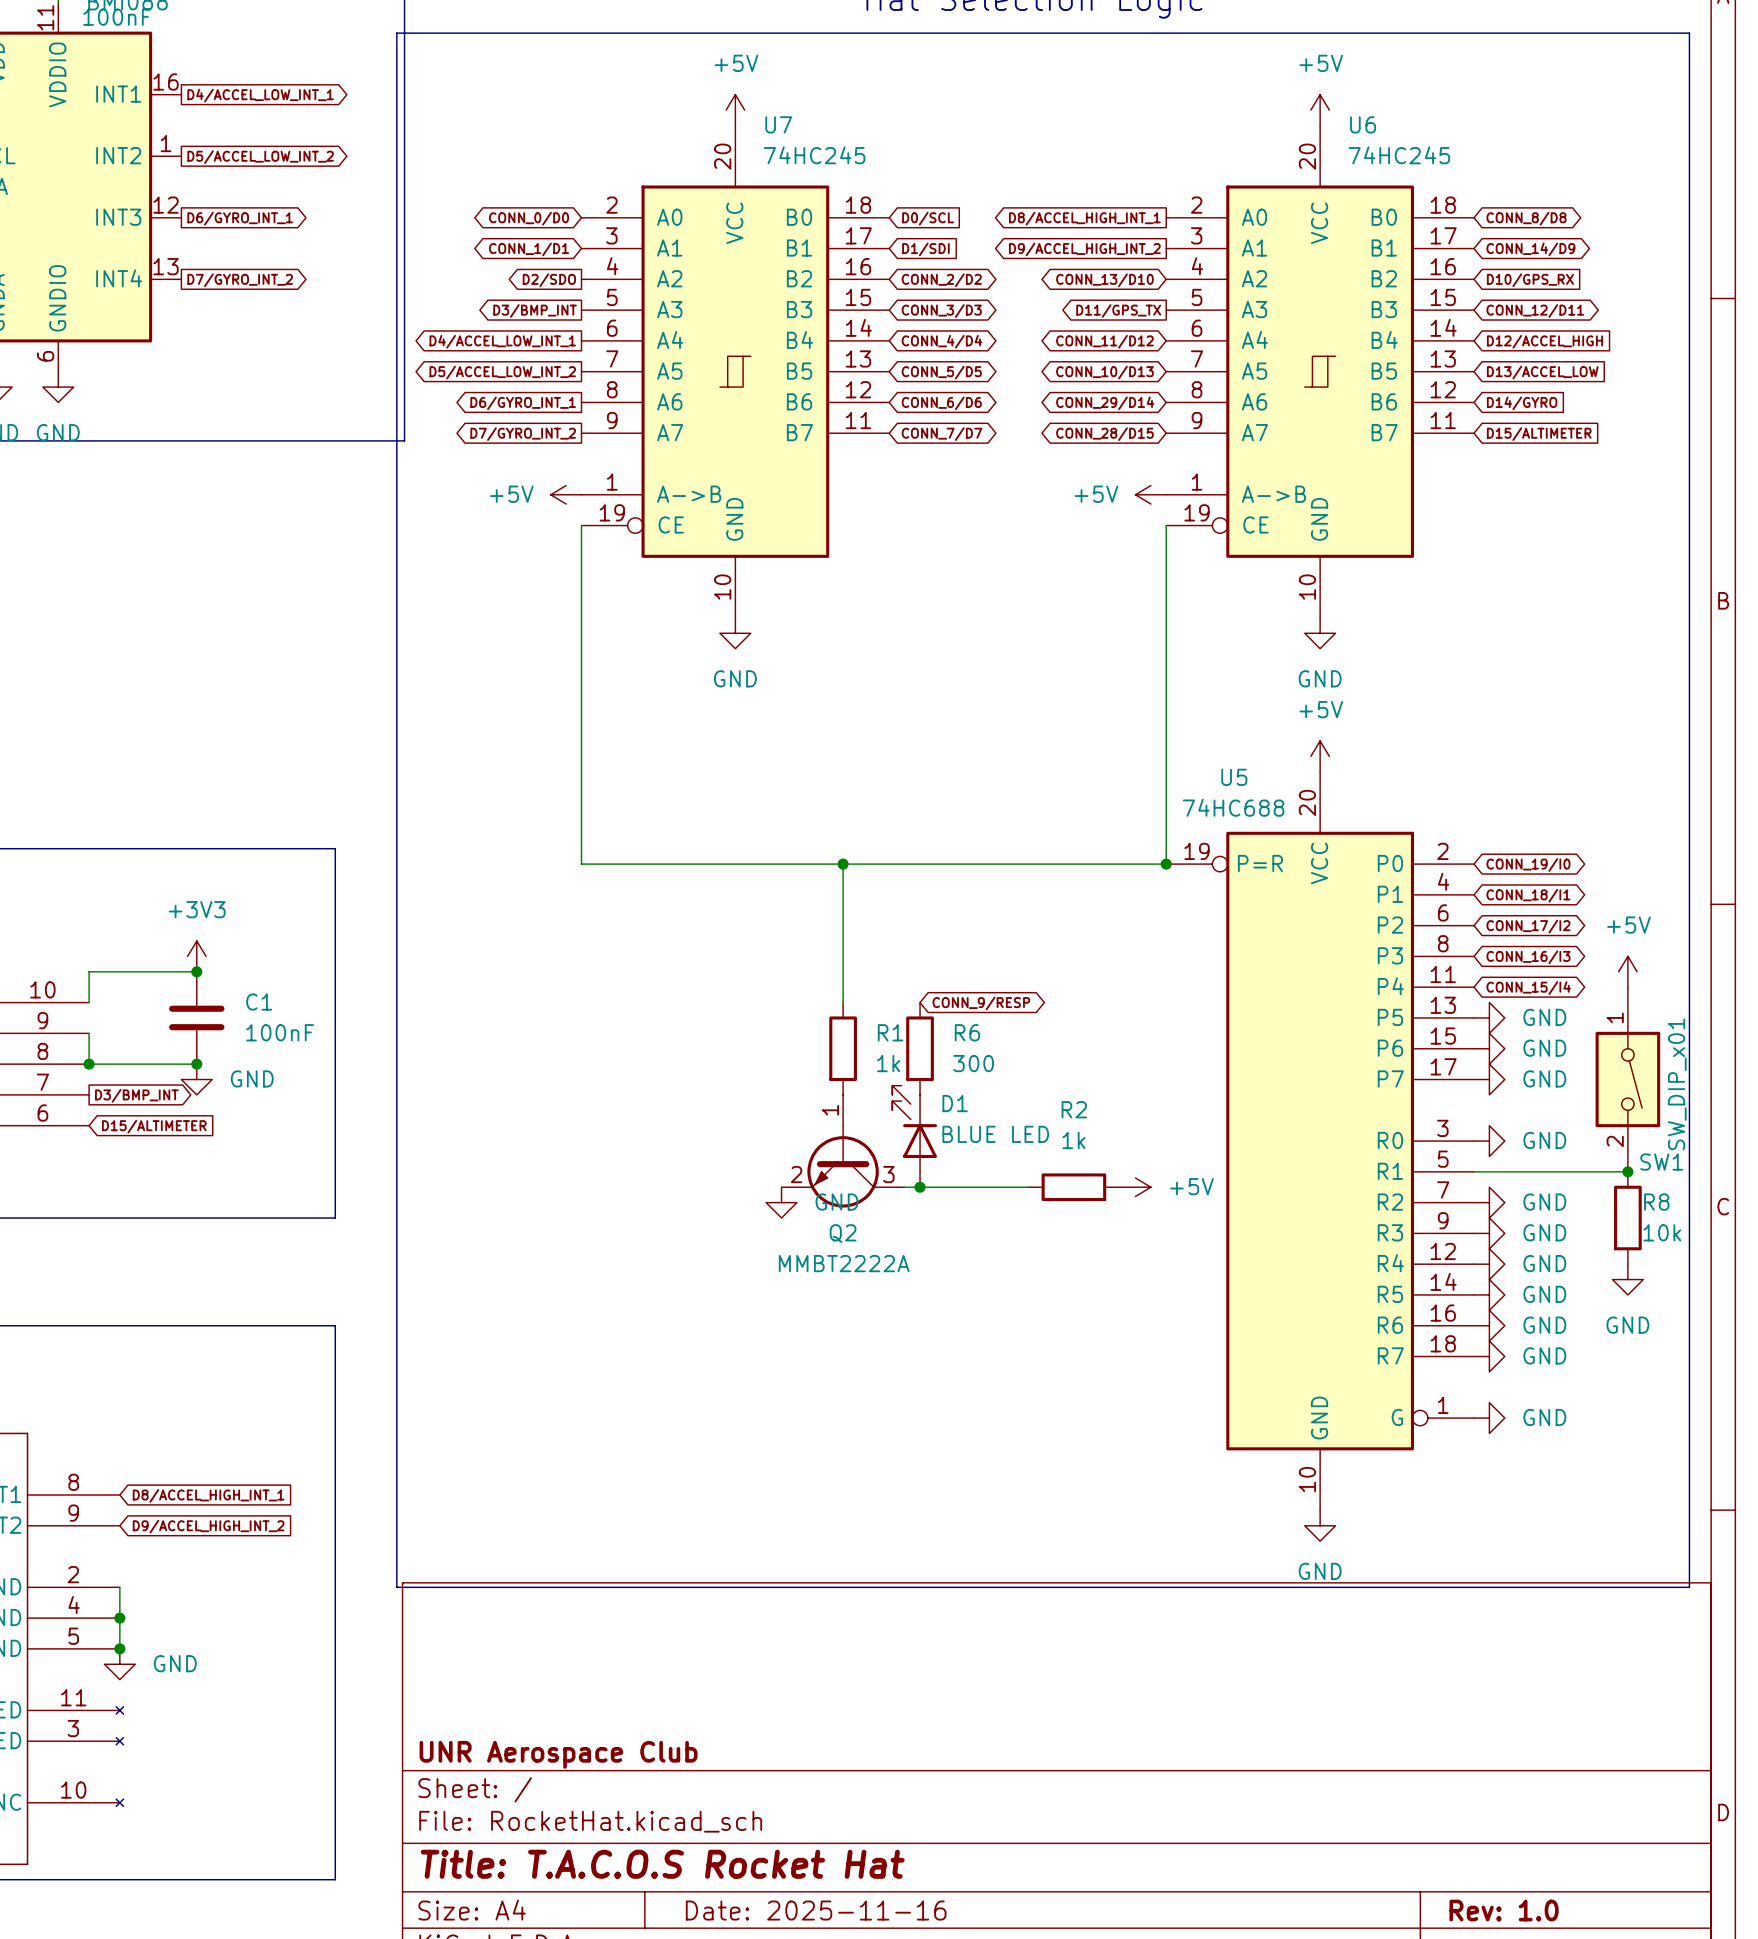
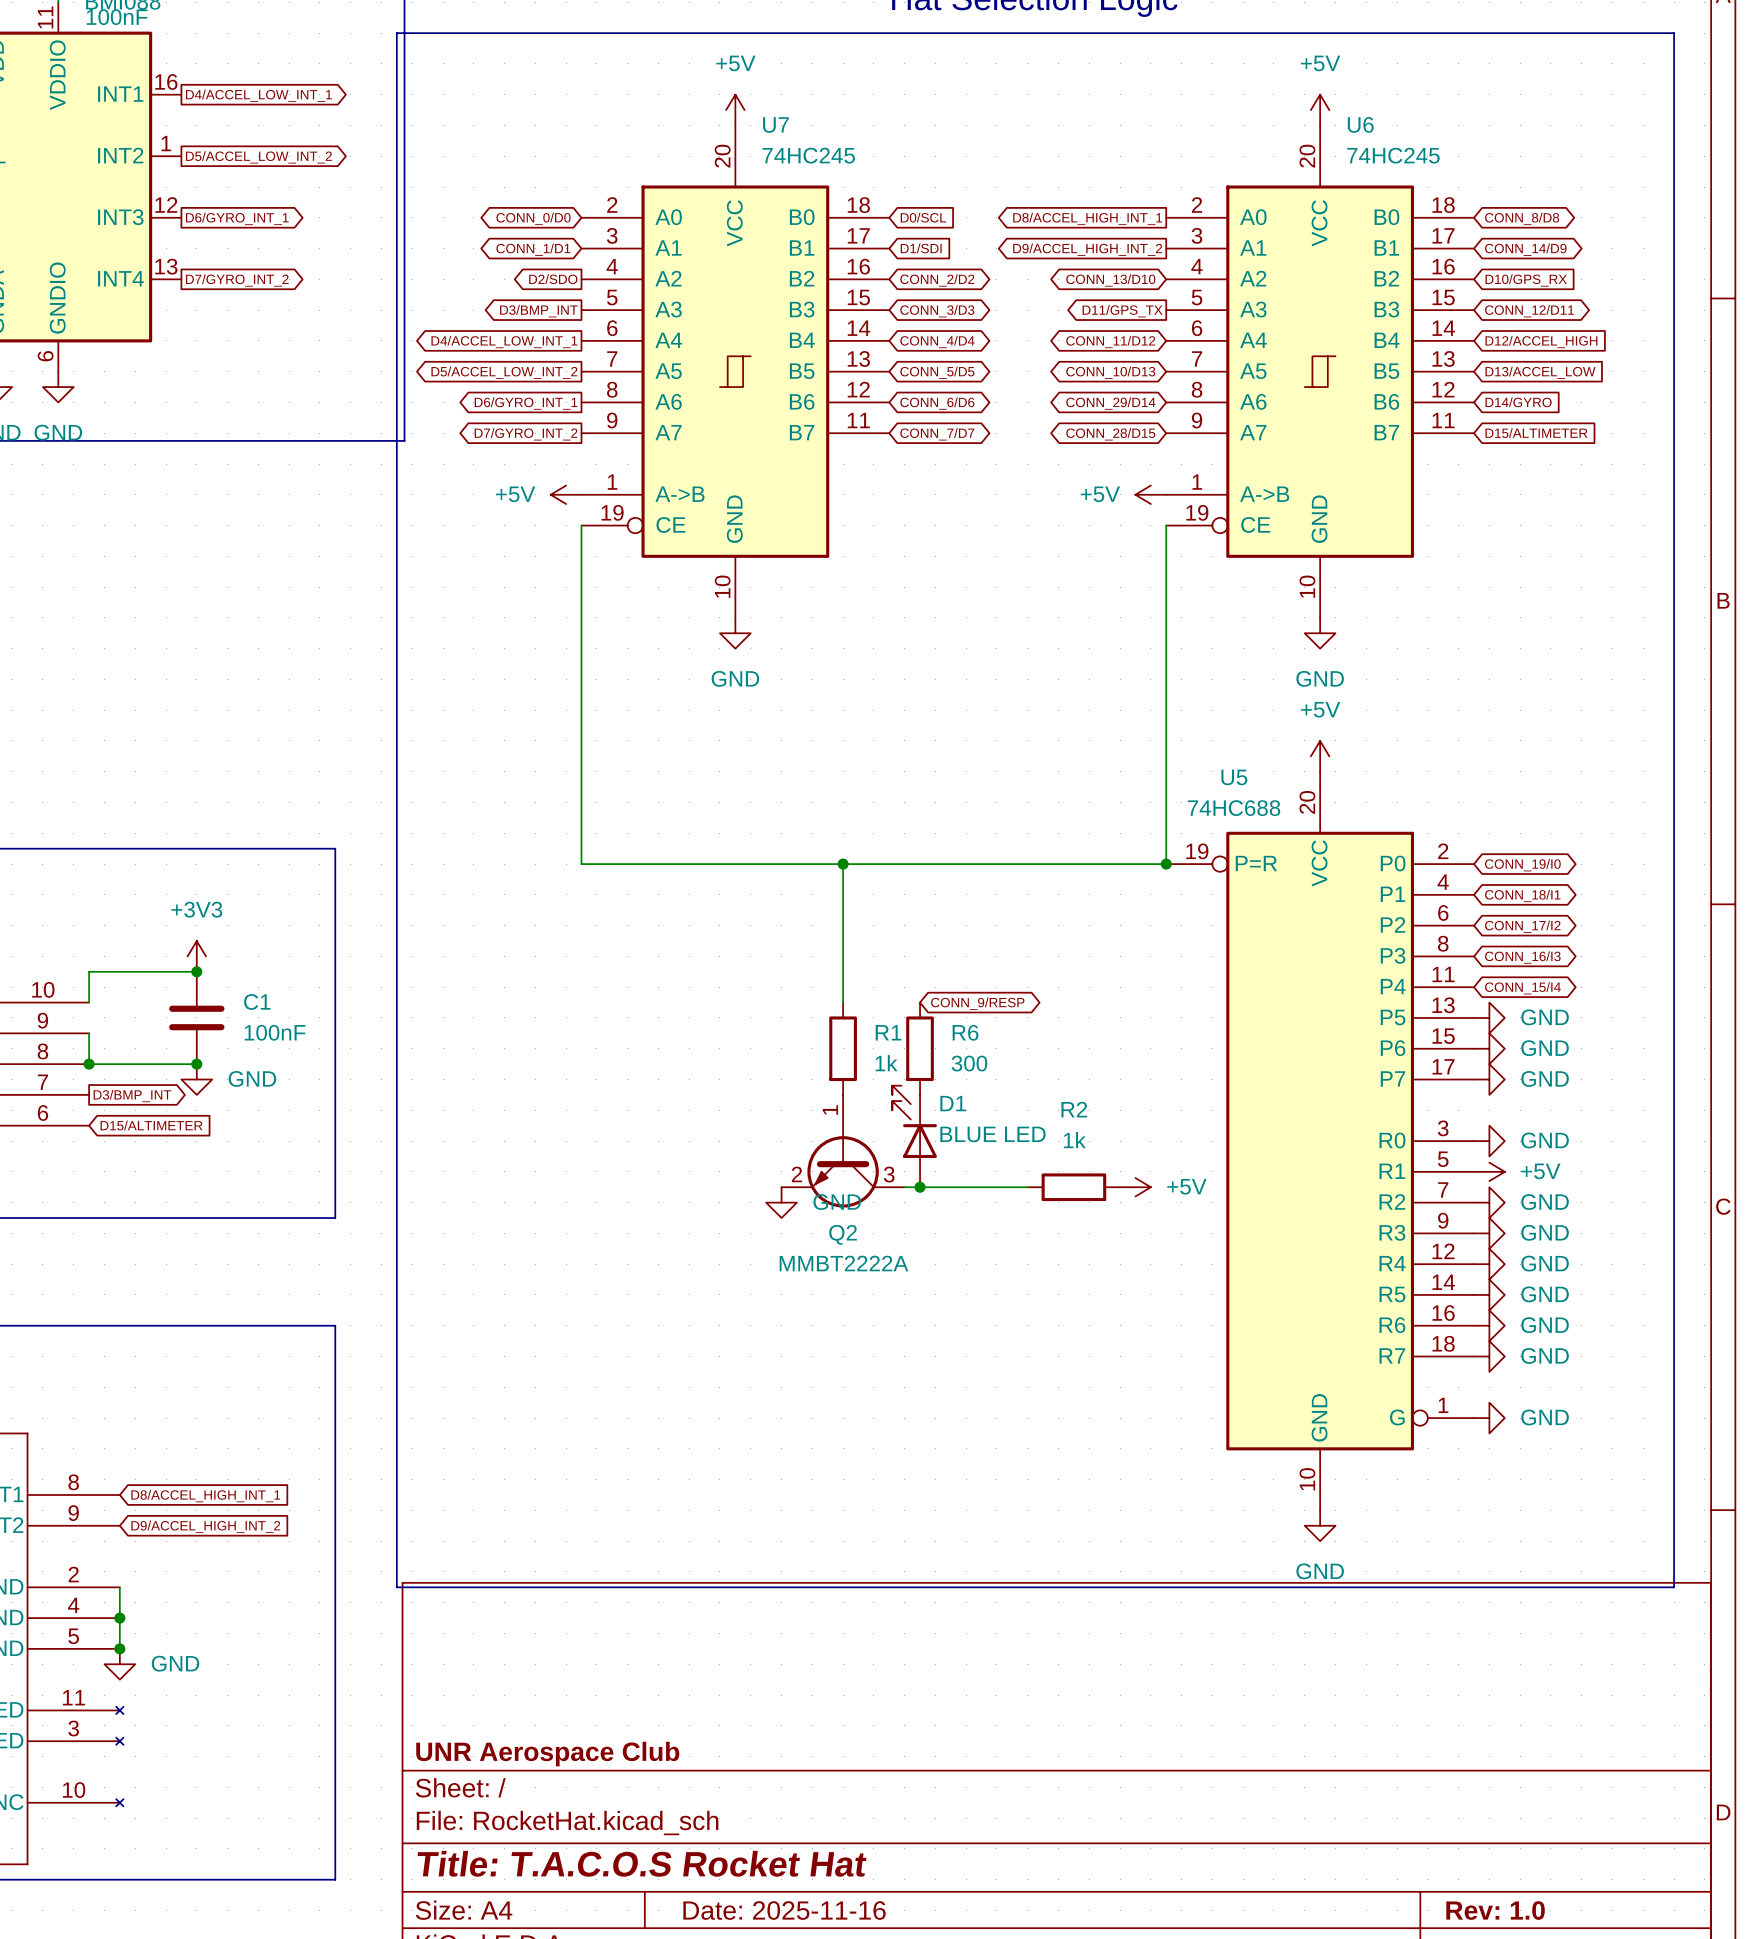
line: (1674, 33) (1689, 33) (1689, 1587) (1674, 1587) -> (1674, 33) (1674, 1587)
power symbol rotation: 0° (1627, 971) -> 90° clockwise (1489, 1171)
power symbol position: +5V (1627, 971) -> +5V (1489, 1171)
SW1: SW_DIP_x01 (1627, 1079) -> none
wire: (1474, 1171) (1627, 1171) -> none
junction: (1627, 1171) -> none
R8: 10k (1627, 1218) -> none
power symbol: GND (1627, 1279) -> none

